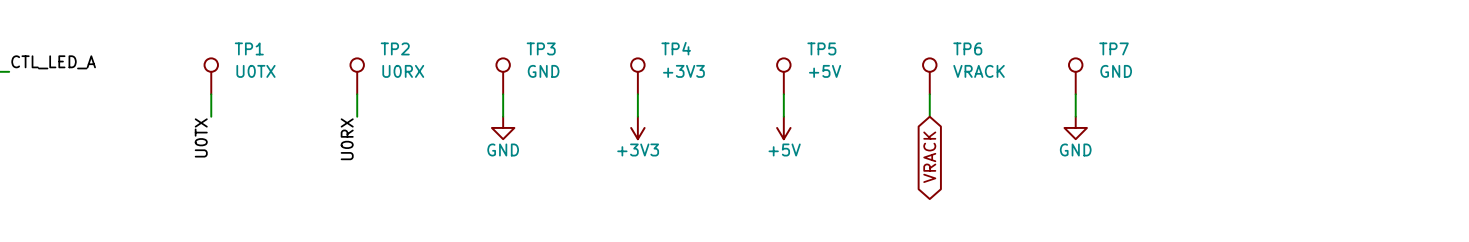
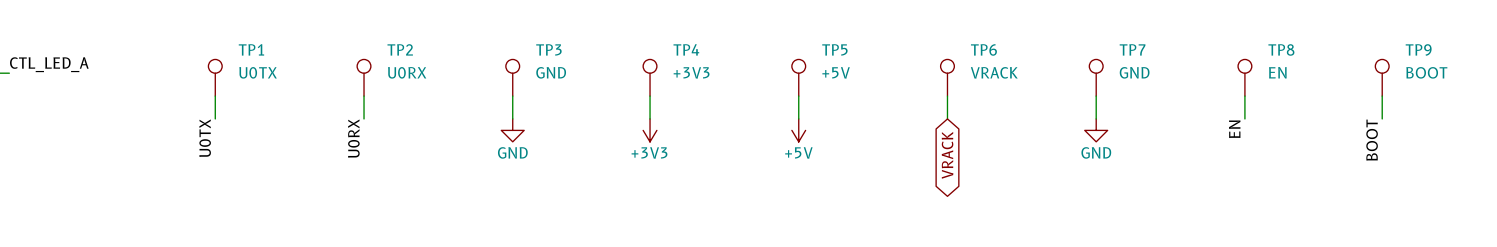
TP8: none -> EN (1244, 77)
TP9: none -> BOOT (1382, 77)
wire: none -> (1244, 96) (1244, 118)
wire: none -> (1382, 96) (1382, 118)
label: none -> EN (1234, 129)
label: none -> BOOT (1372, 140)

